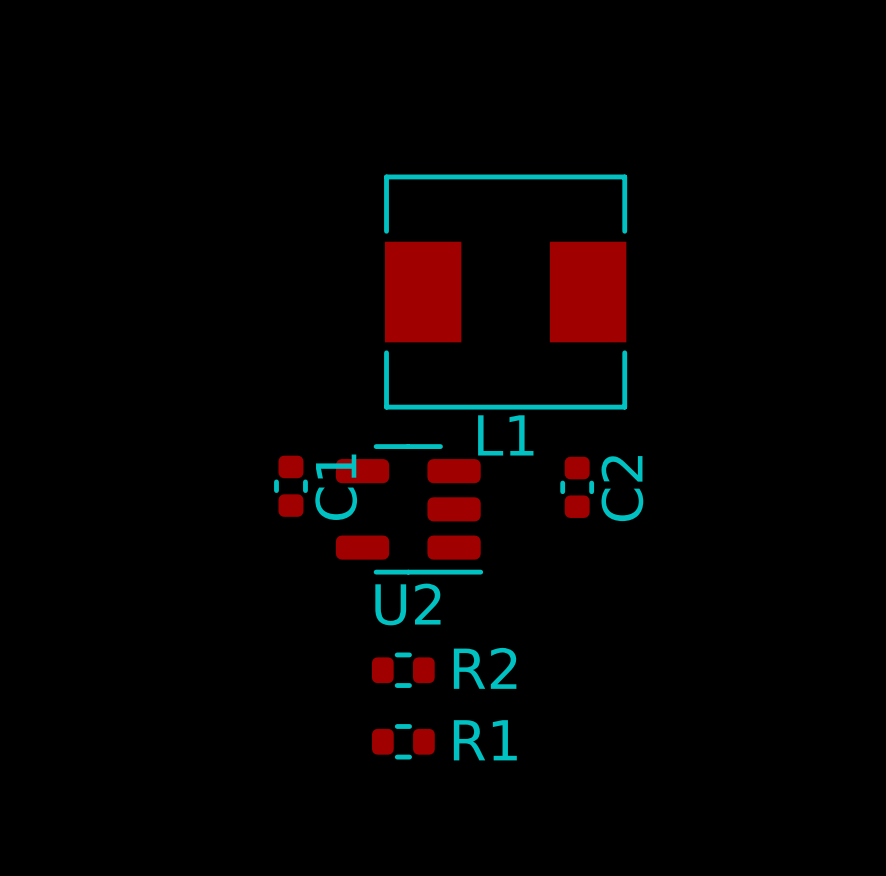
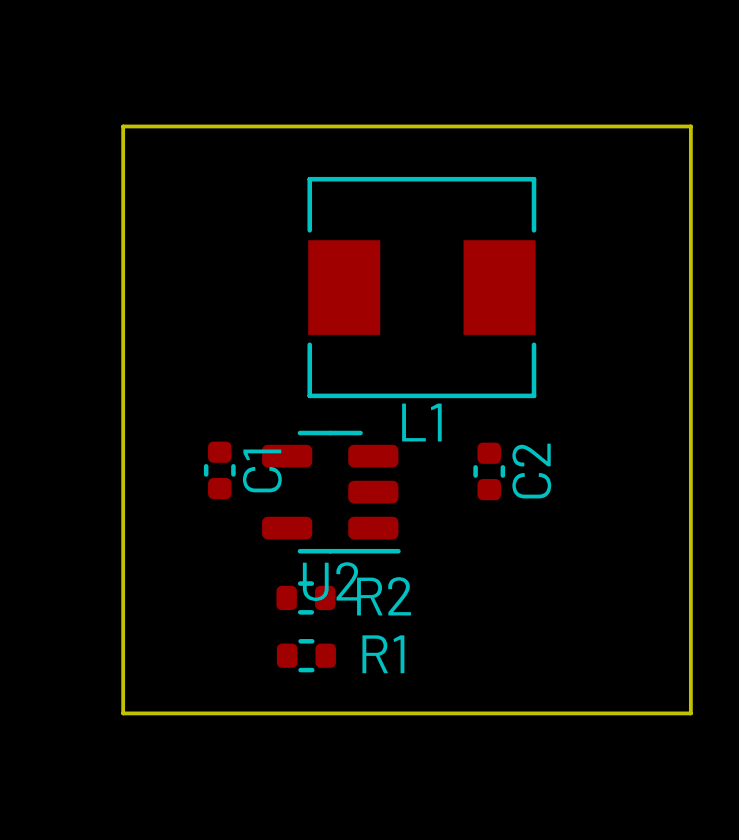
board edge: none -> (123, 126) (690, 126) (690, 713) (123, 713) (123, 126)
R2 position: (403, 670) -> (305, 597)
R1 position: (403, 741) -> (306, 655)

